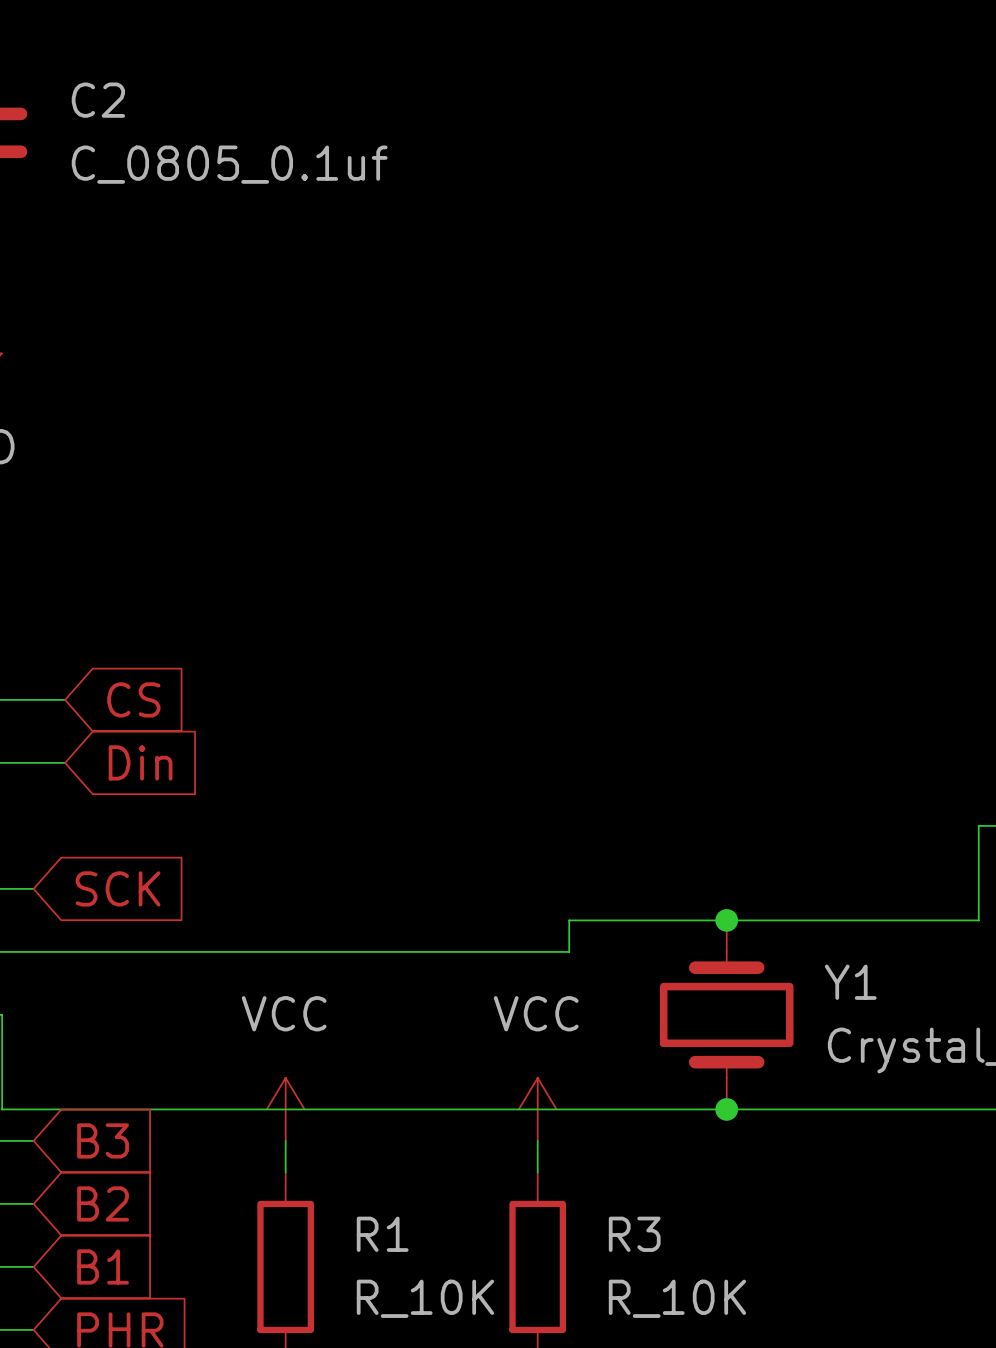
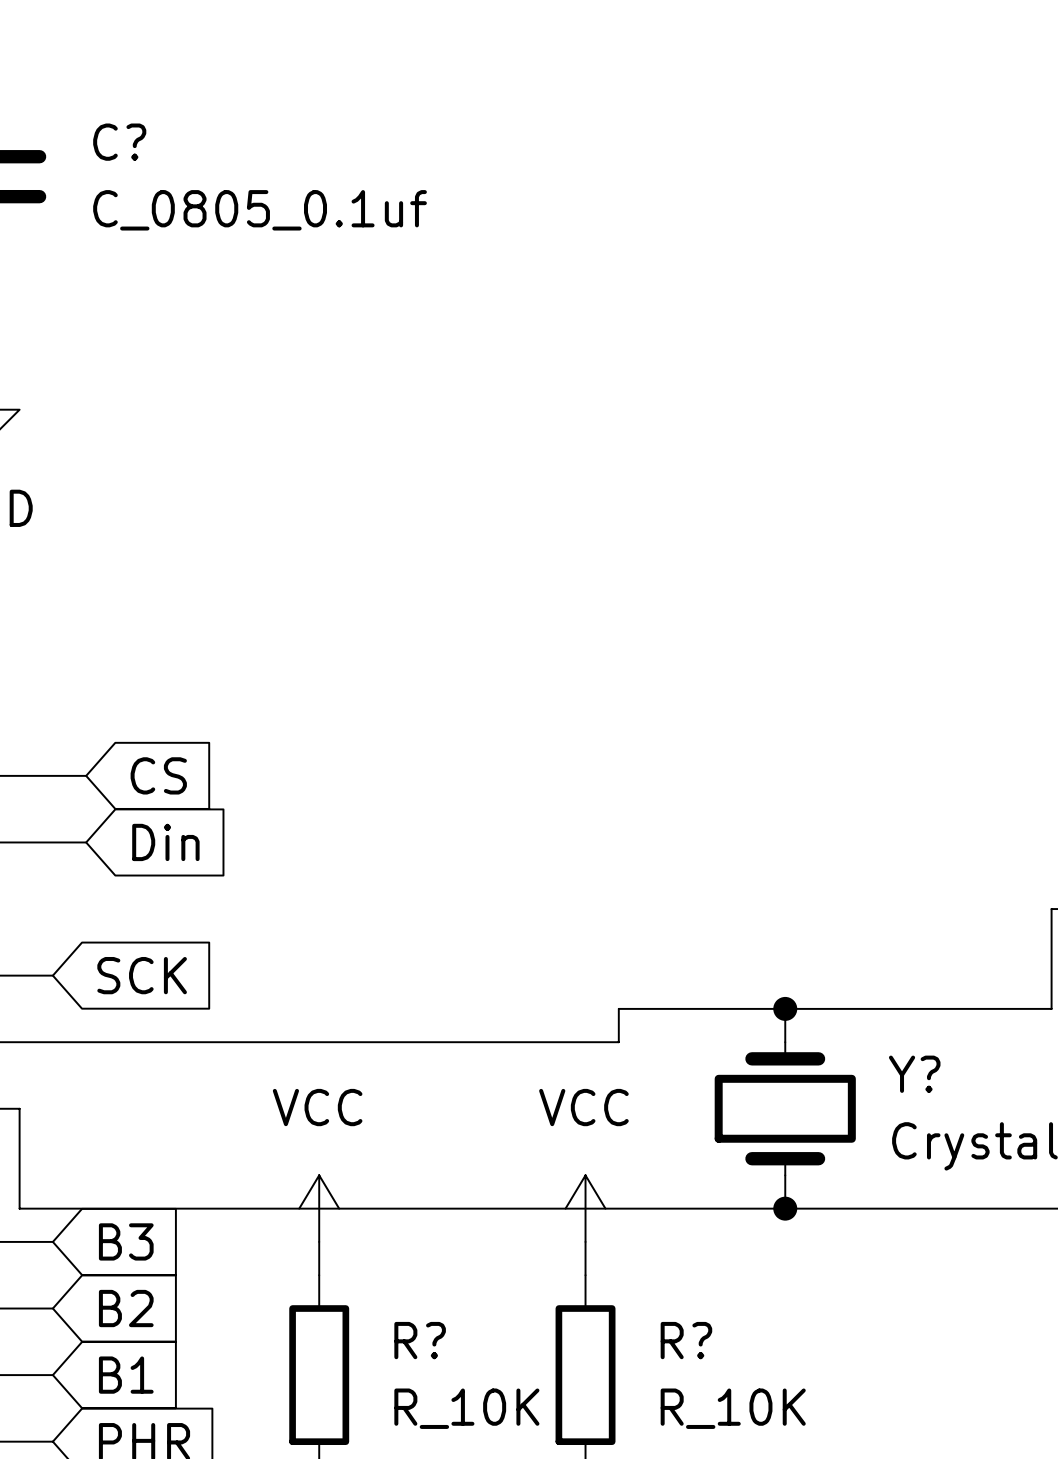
C2 name: C2 (98, 100) -> C? (119, 142)
Y1 name: Y1 (850, 982) -> Y? (914, 1074)
R1 name: R1 (382, 1234) -> R? (420, 1340)
R3 name: R3 (634, 1234) -> R? (686, 1340)

